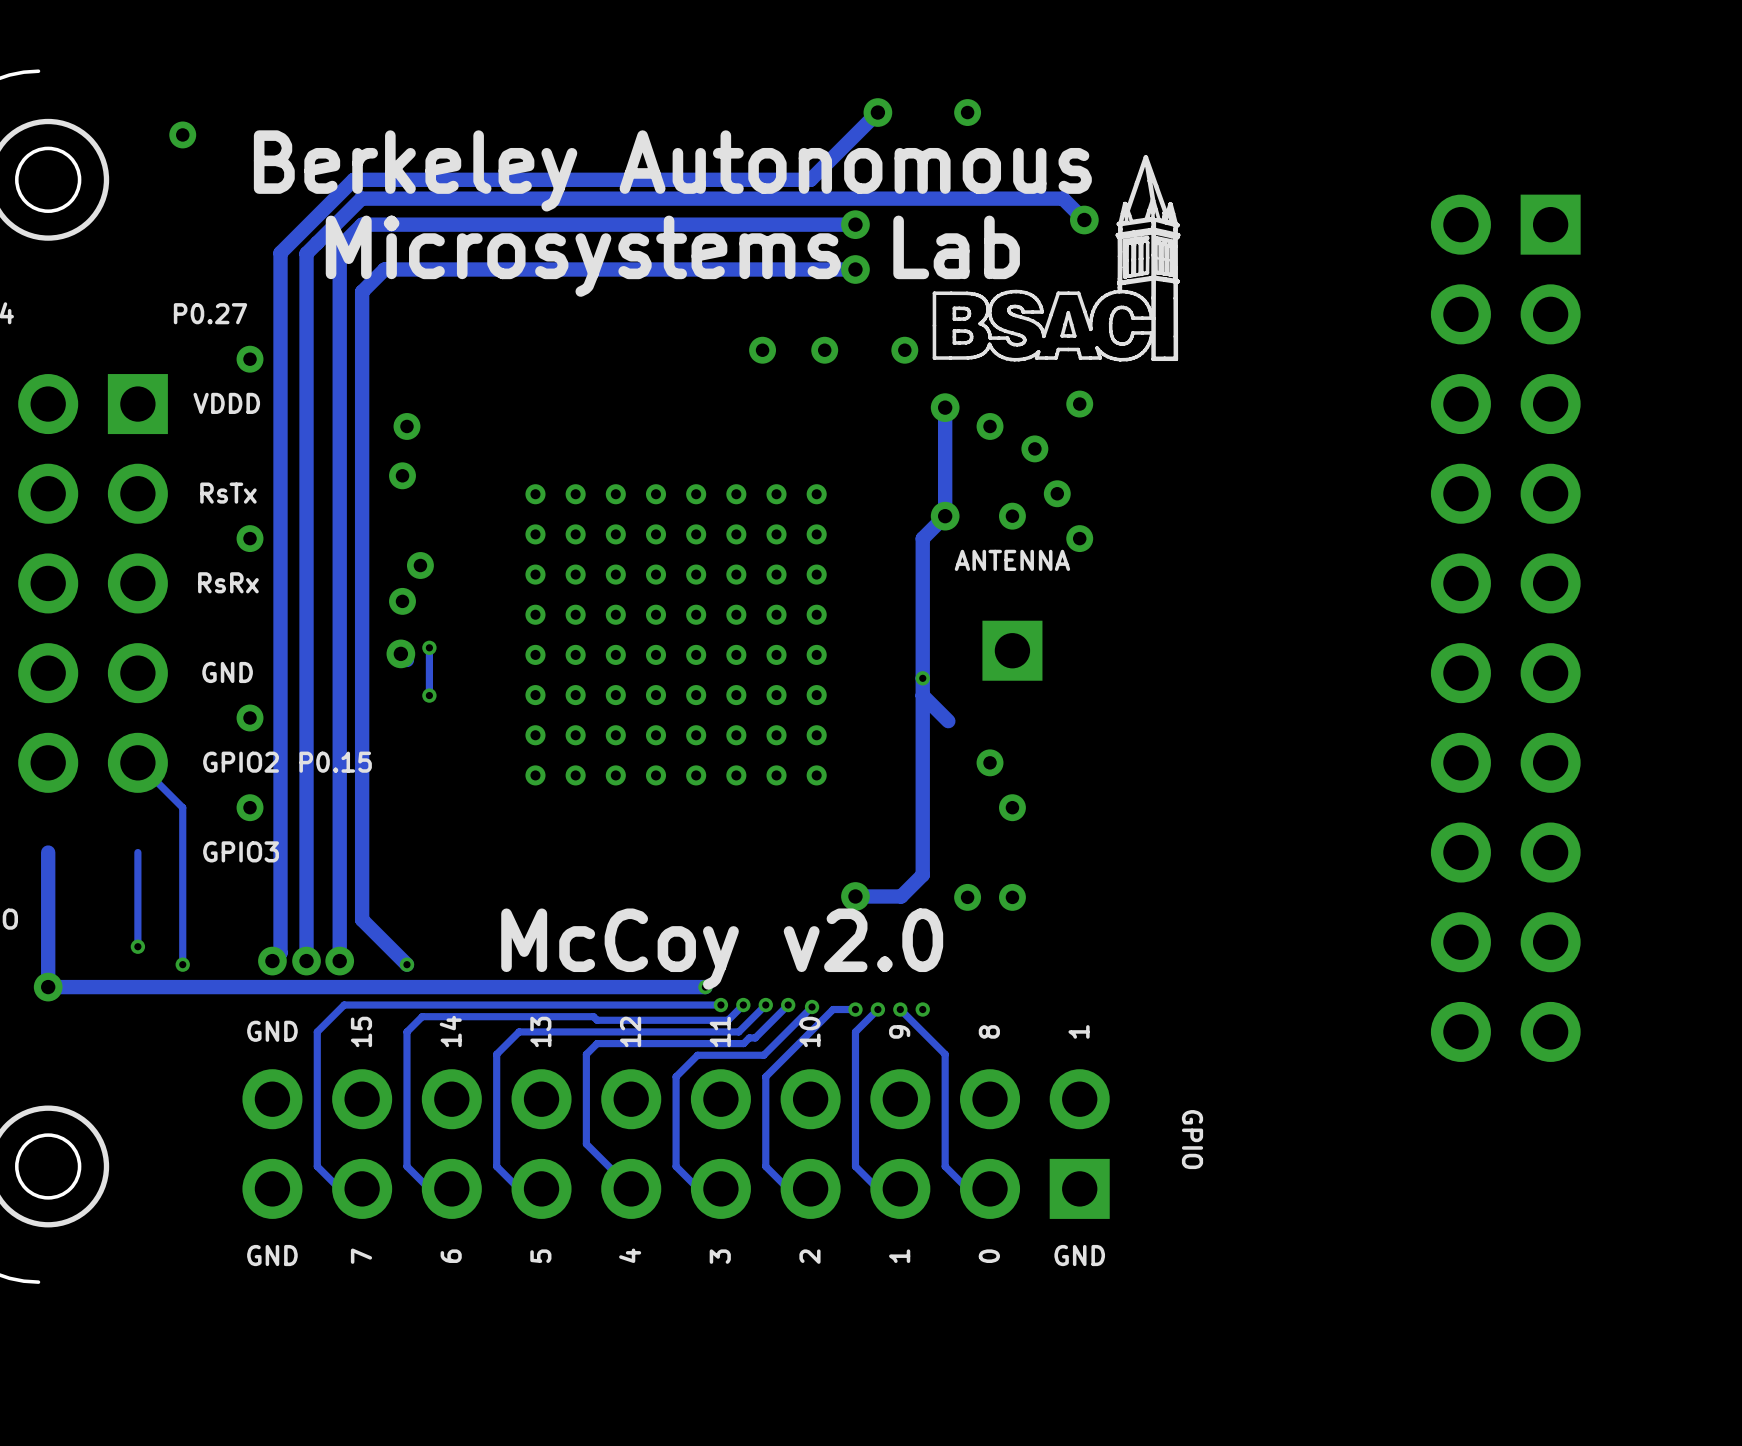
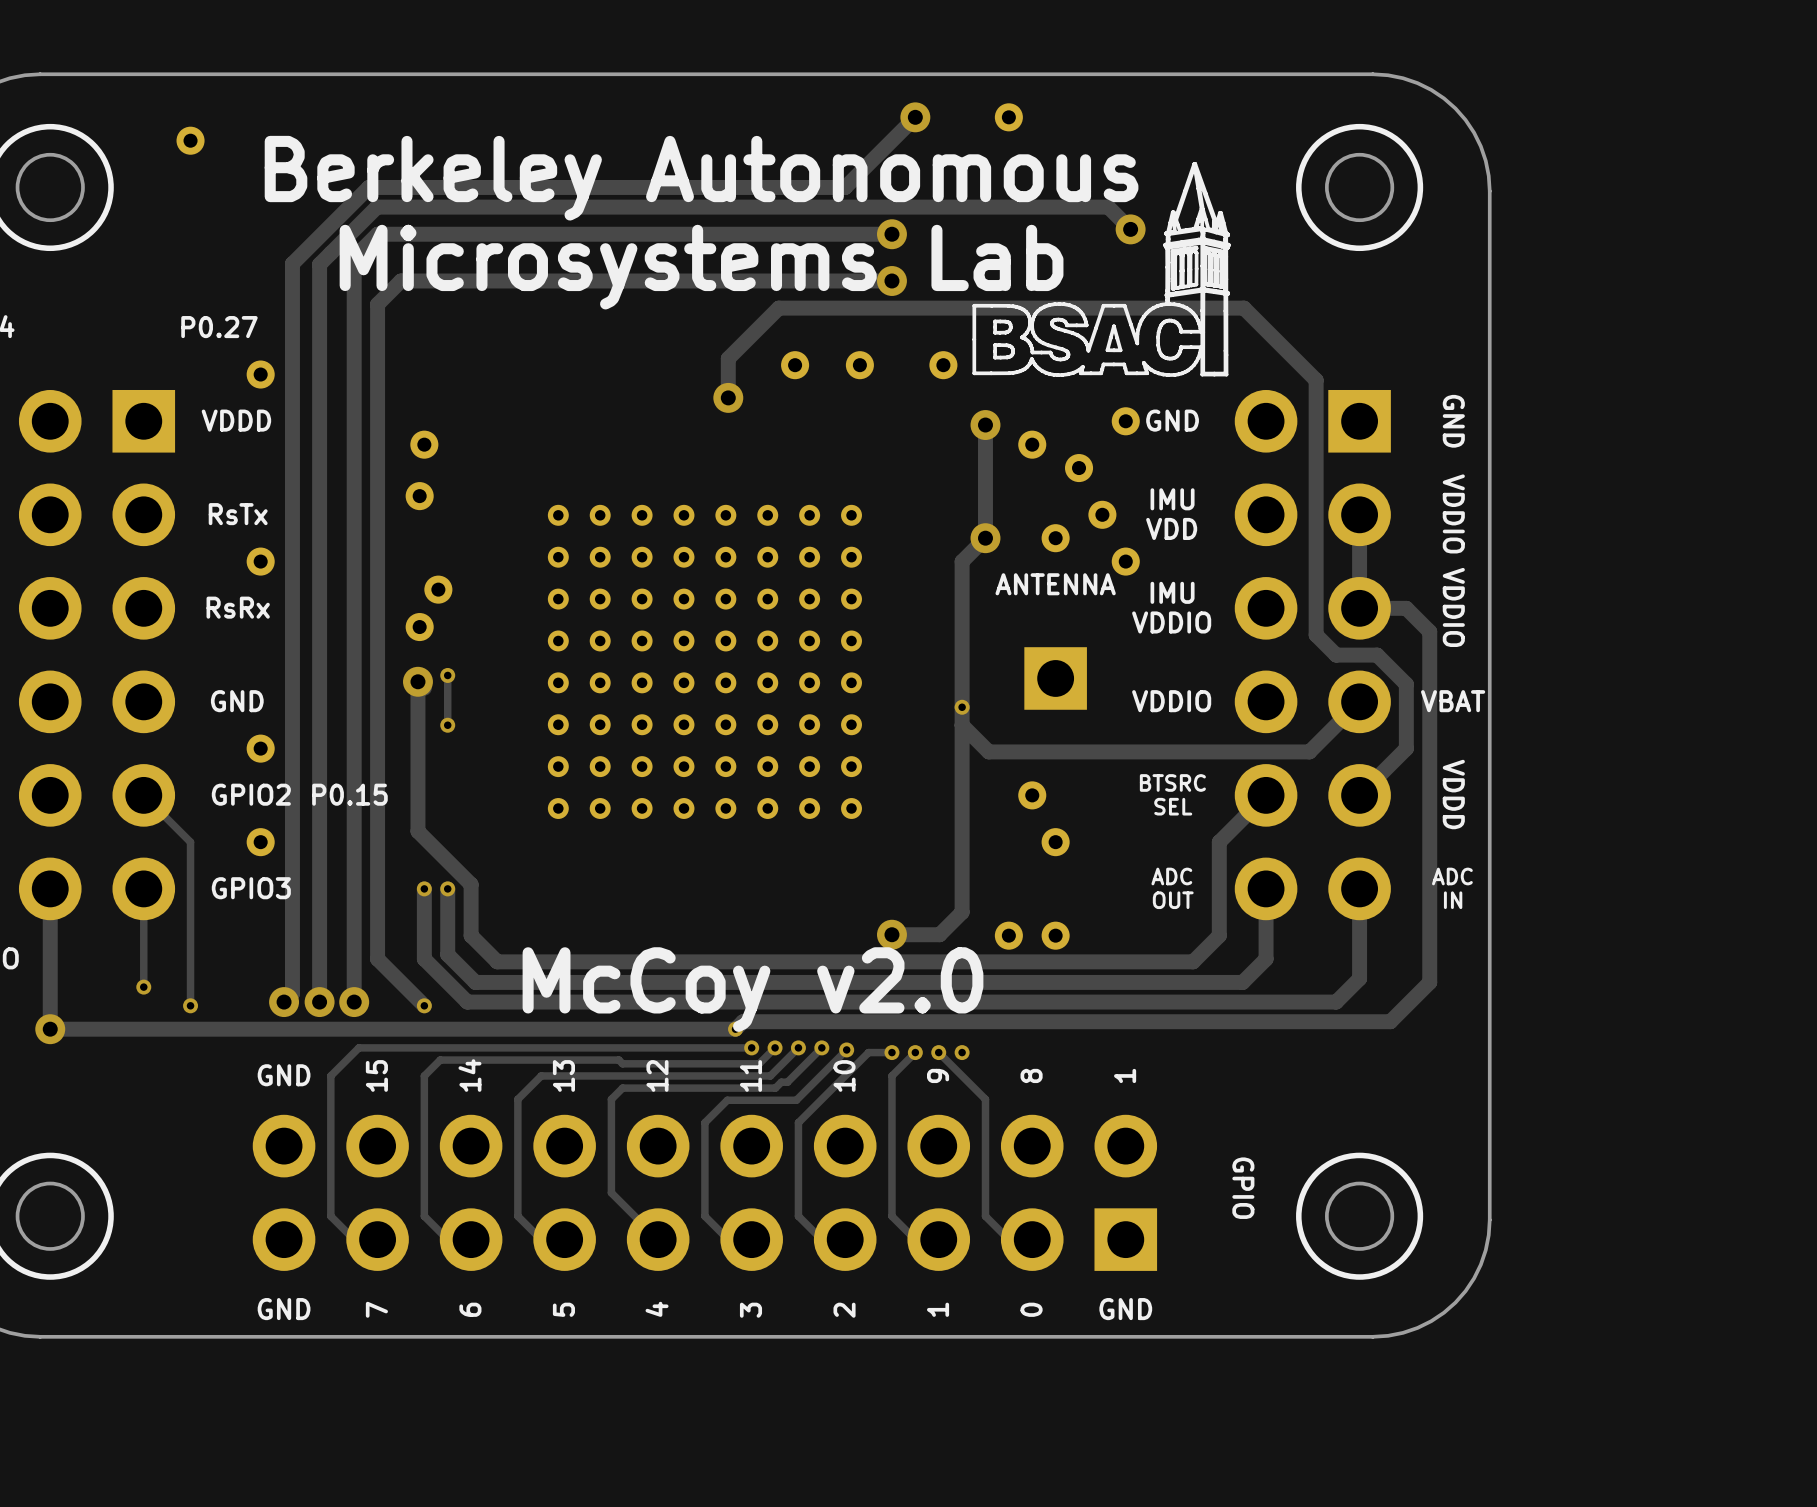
board edge: none -> (40, 74) (1388, 75) (1403, 78) (1431, 89) (1444, 98) (1465, 119) (1480, 146) (1485, 160) (1489, 191) (1489, 1219) (1485, 1250) (1480, 1264) (1465, 1291) (1444, 1312) (1417, 1327) (1403, 1332) (1372, 1336) (40, 1336)
drawing: none -> [1296, 123, 1424, 252]
round board edge: none -> [1325, 152, 1395, 223]
track: none -> (728, 397) (728, 358) (778, 308) (1243, 308) (1316, 380) (1316, 635) (1336, 655) (1377, 655) (1406, 684) (1406, 748) (1359, 795)
via: none -> (728, 397)
text: none -> GND (1172, 420)
text: none -> GND (1453, 421)
text: none -> IMU (1172, 499)
text: none -> VDDIO (1453, 513)
track: none -> (1359, 514) (1359, 608) (1406, 608) (1429, 631) (1429, 982) (1390, 1021) (743, 1021) (735, 1029)
text: none -> VDD (1171, 528)
text: none -> IMU (1172, 592)
text: none -> VDDIO (1453, 607)
text: none -> VDDIO (1171, 622)
part: none -> (97, 655)
part: none -> (1312, 655)
part: (1505, 628) -> none
track: none -> (417, 681) (417, 831) (471, 884) (471, 935) (497, 961) (1193, 961) (1219, 935) (1219, 842) (1266, 795)
text: none -> VDDIO (1171, 701)
text: none -> VBAT (1453, 701)
track: none -> (1359, 701) (1309, 751) (988, 751)
text: none -> BTSRC (1172, 782)
text: none -> VDDD (1453, 794)
text: none -> SEL (1173, 806)
text: none -> ADC (1171, 876)
text: none -> ADC (1452, 876)
via: none -> (424, 888)
via: none -> (447, 888)
track: none -> (1266, 888) (1266, 959) (1242, 982) (475, 982) (447, 954) (447, 888)
track: none -> (1359, 888) (1359, 978) (1336, 1002) (467, 1002) (424, 959) (424, 888)
text: none -> OUT (1173, 900)
text: none -> IN (1453, 900)
drawing: none -> [1296, 1152, 1424, 1280]
round board edge: none -> [1325, 1181, 1395, 1251]

